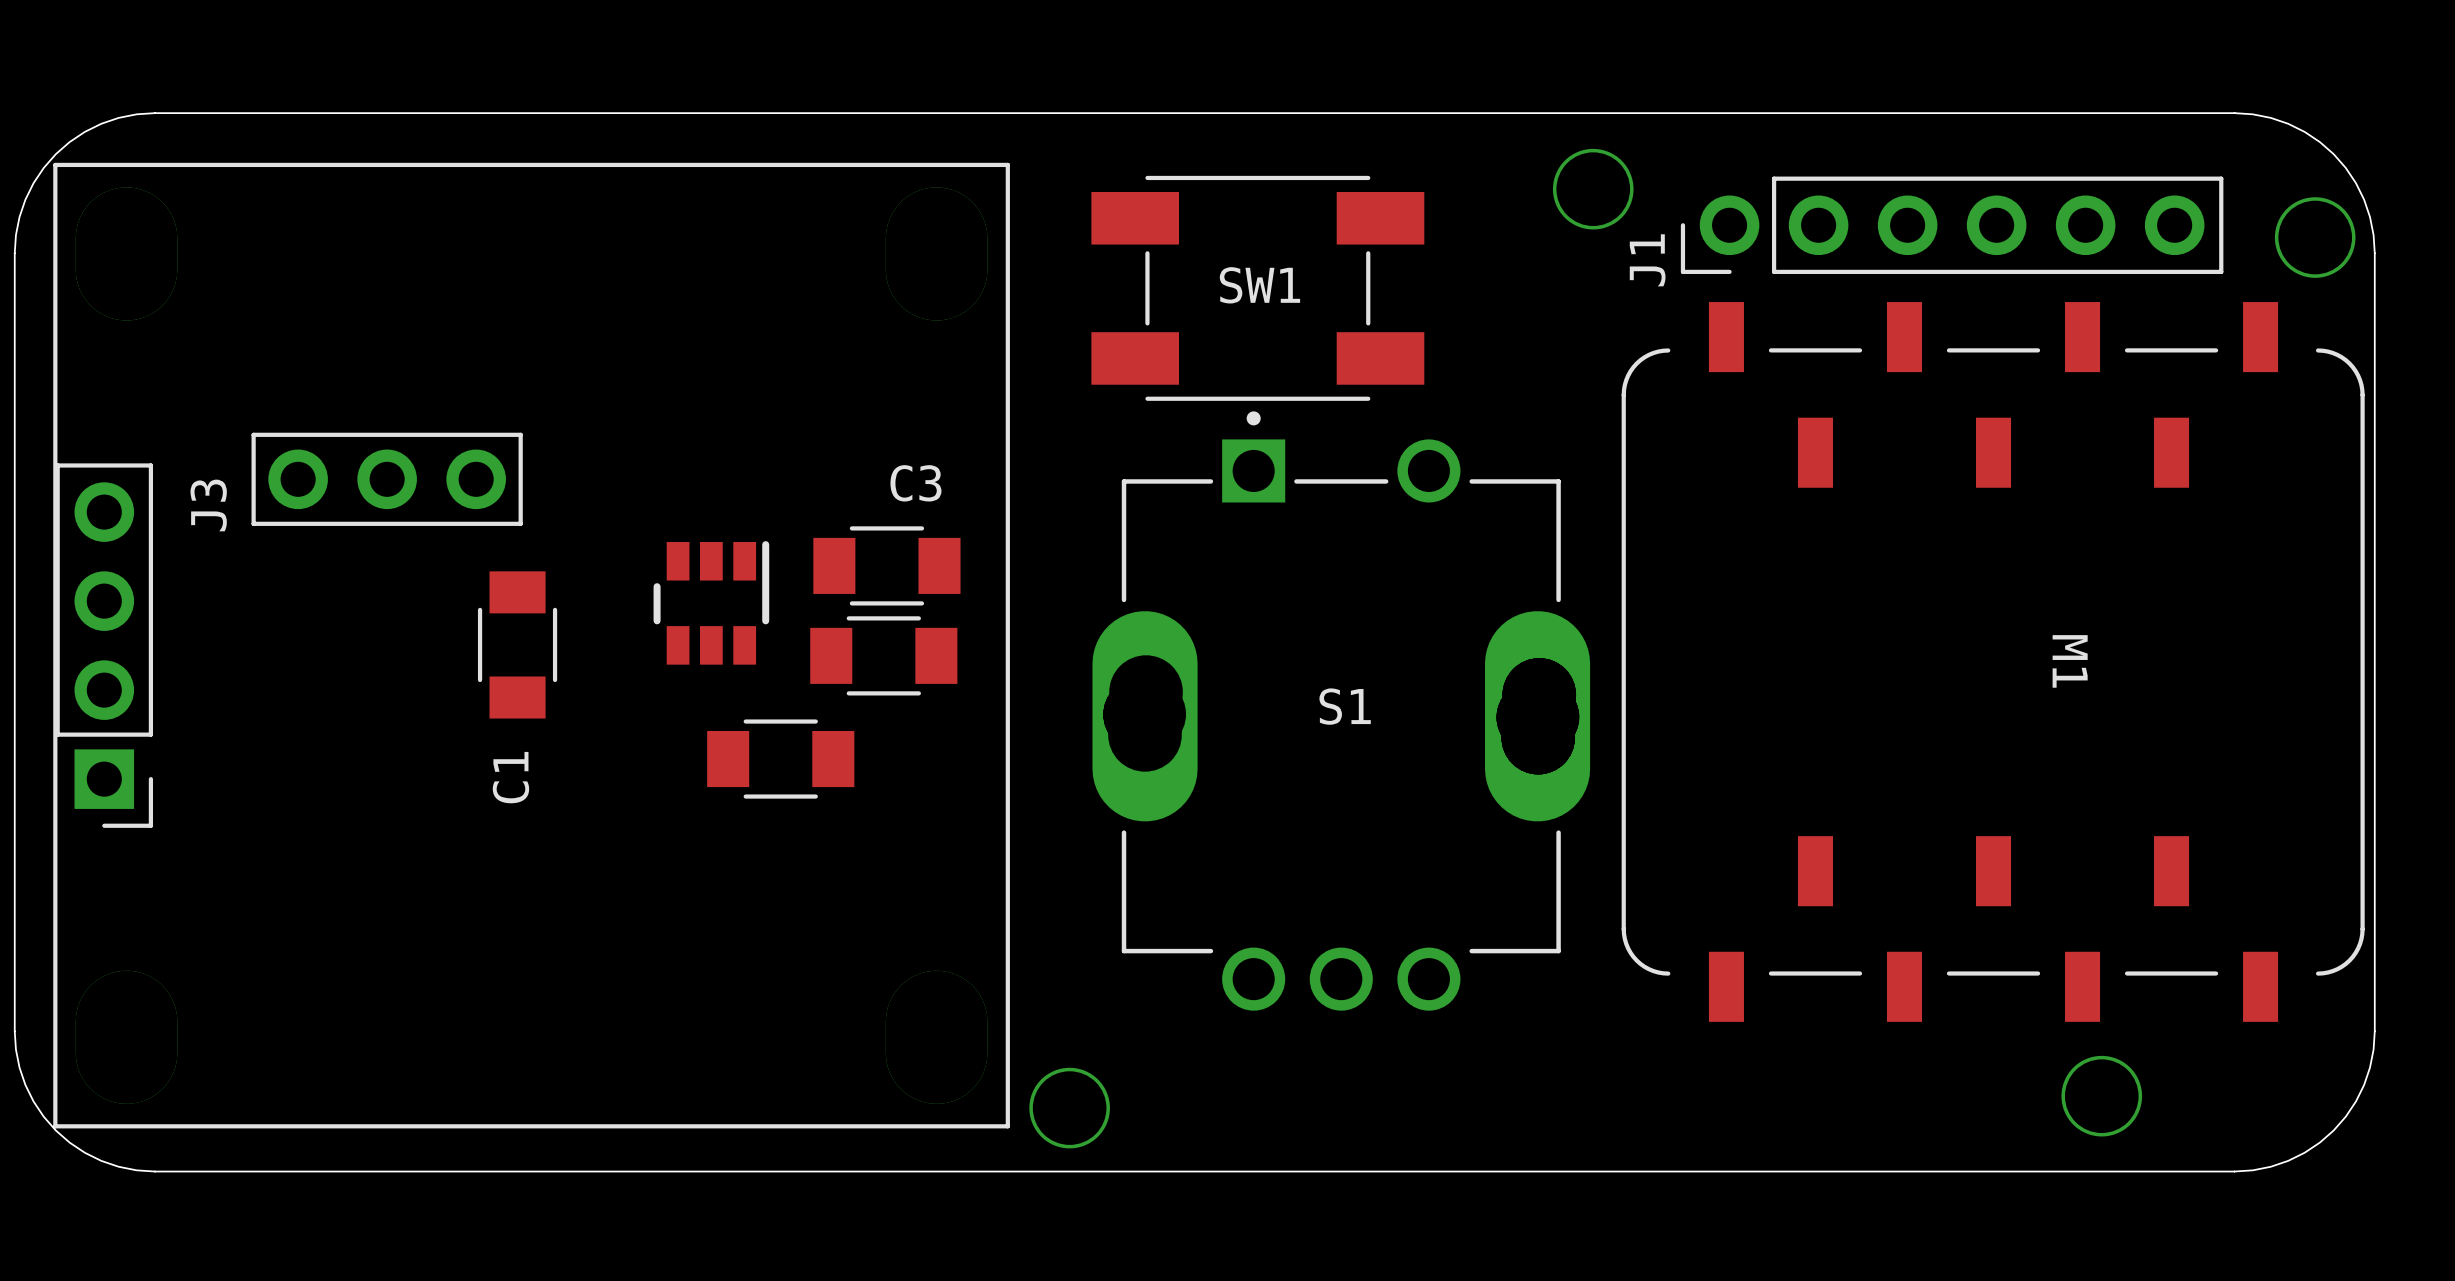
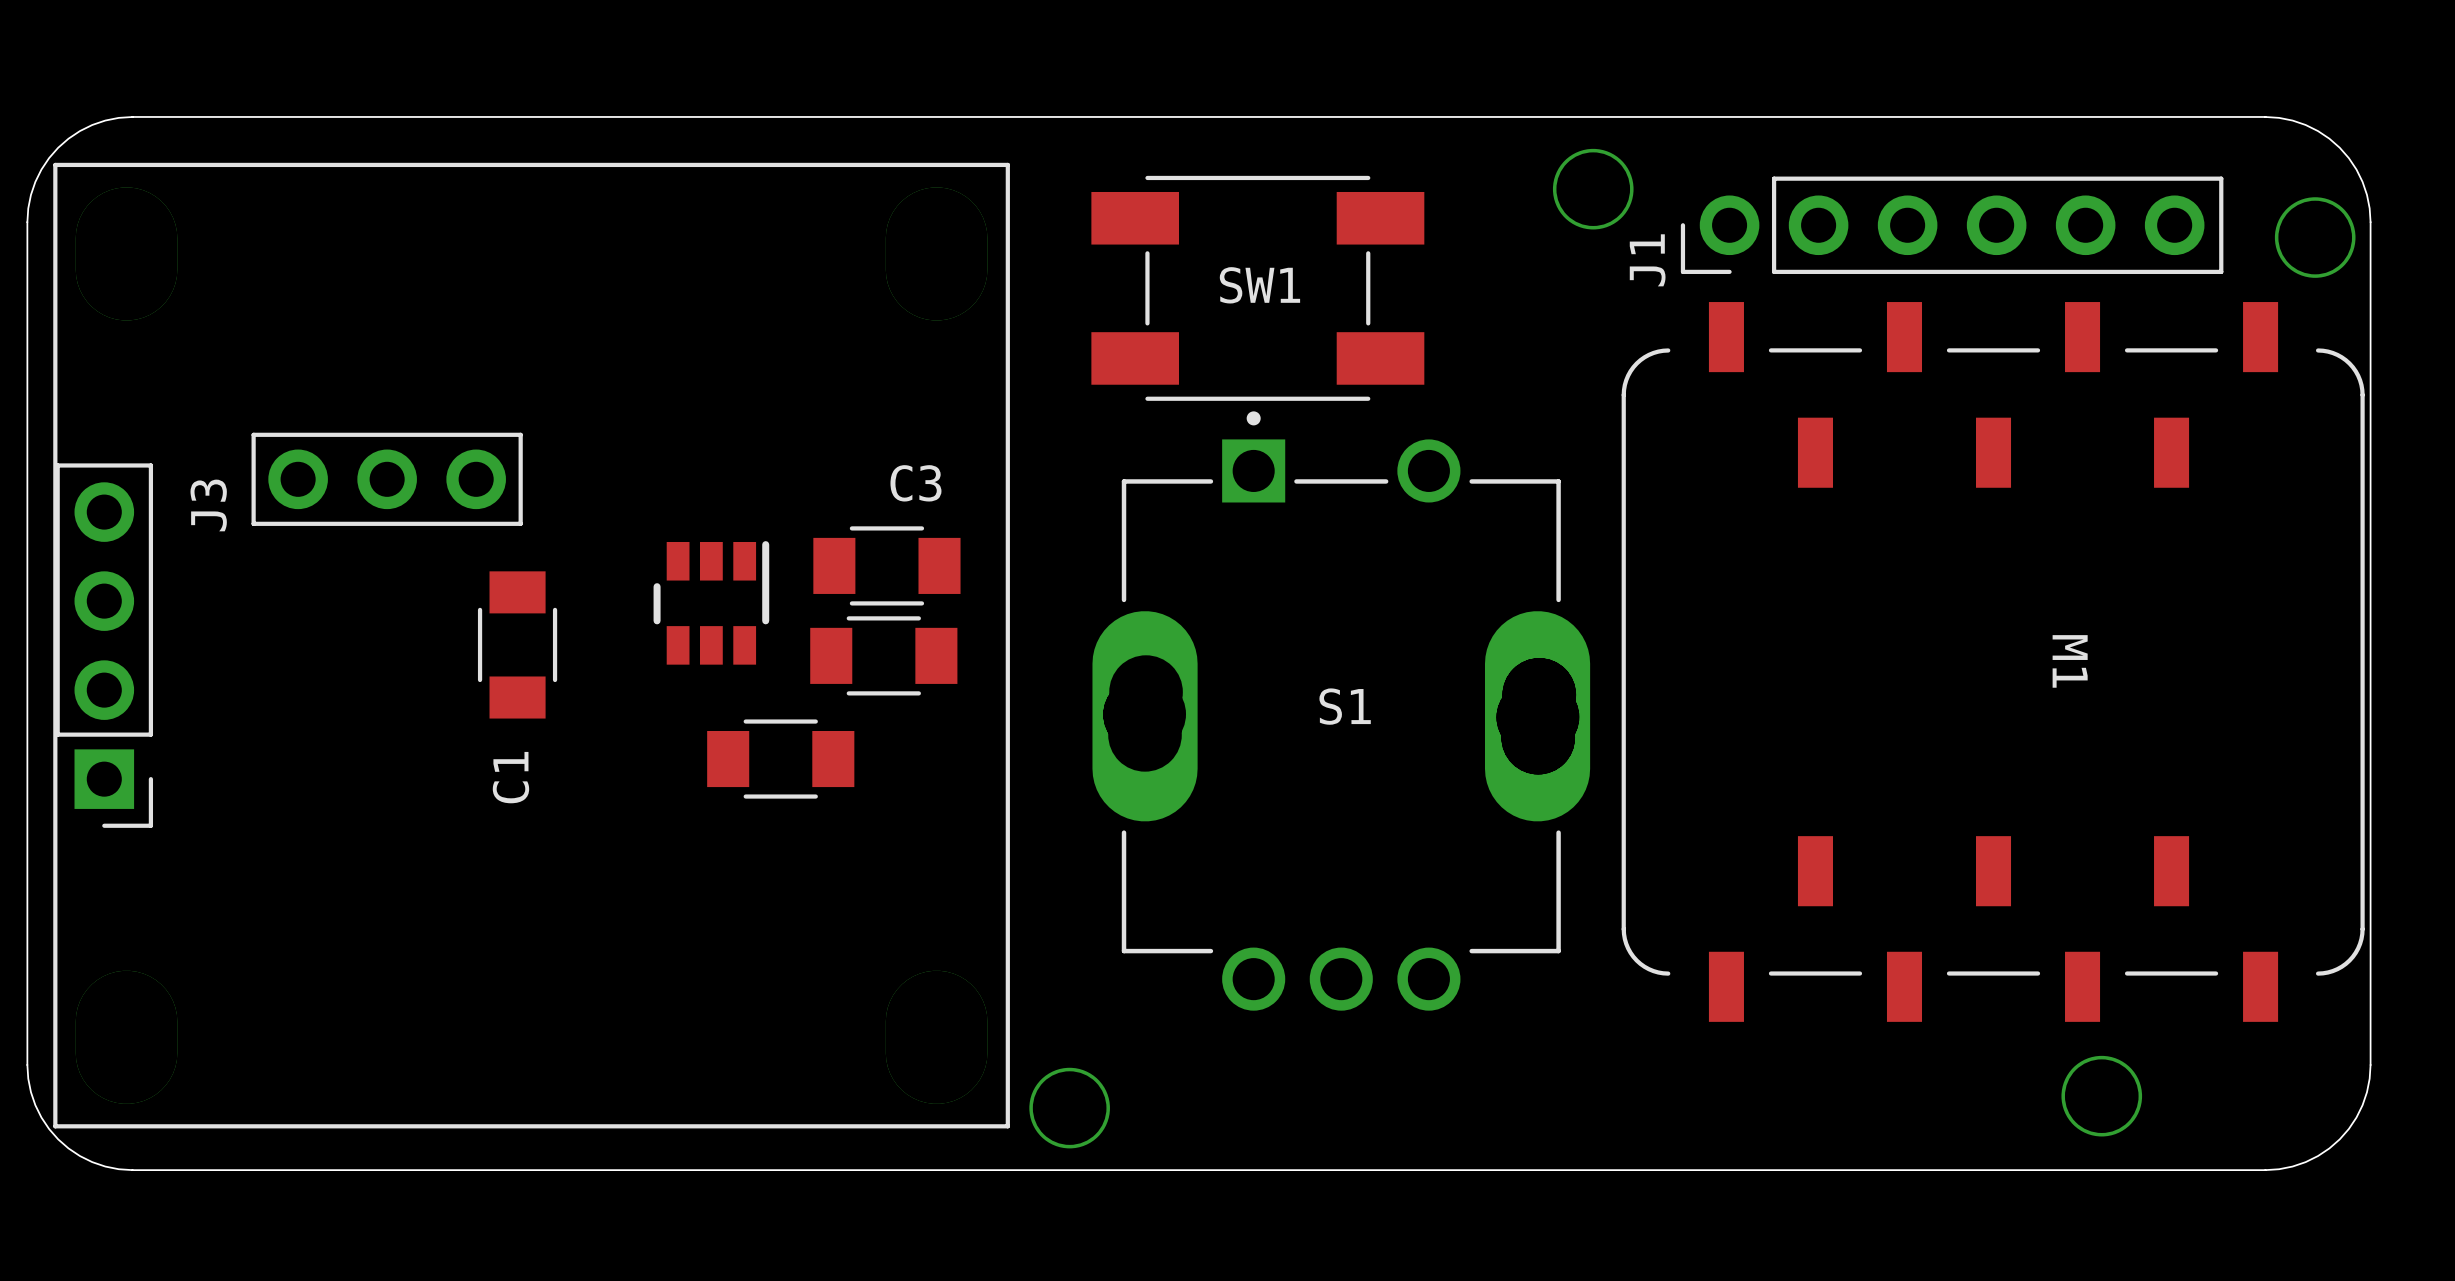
board edge: (154, 113) (2234, 113) (2270, 117) (2288, 123) (2319, 142) (2345, 167) (2364, 199) (2373, 235) (2374, 1031) (2370, 1067) (2364, 1084) (2345, 1116) (2319, 1142) (2288, 1160) (2270, 1166) (2234, 1171) (154, 1171) (118, 1166) (101, 1160) (69, 1142) (43, 1116) (25, 1084) (15, 1049) (14, 253) (19, 217) (25, 199) (43, 167) (55, 154) (84, 131) (101, 123) (136, 114) (154, 113) -> (132, 116) (118, 117) (92, 124) (68, 138) (58, 147) (41, 169) (35, 181) (30, 194) (27, 222) (28, 1078) (35, 1105) (49, 1128) (68, 1148) (92, 1162) (105, 1166) (132, 1170) (2265, 1170) (2292, 1166) (2305, 1162) (2329, 1148) (2348, 1128) (2362, 1105) (2369, 1078) (2370, 1064) (2370, 222) (2366, 194) (2356, 169) (2339, 147) (2329, 138) (2305, 124) (2292, 120) (2265, 116) (132, 116)

